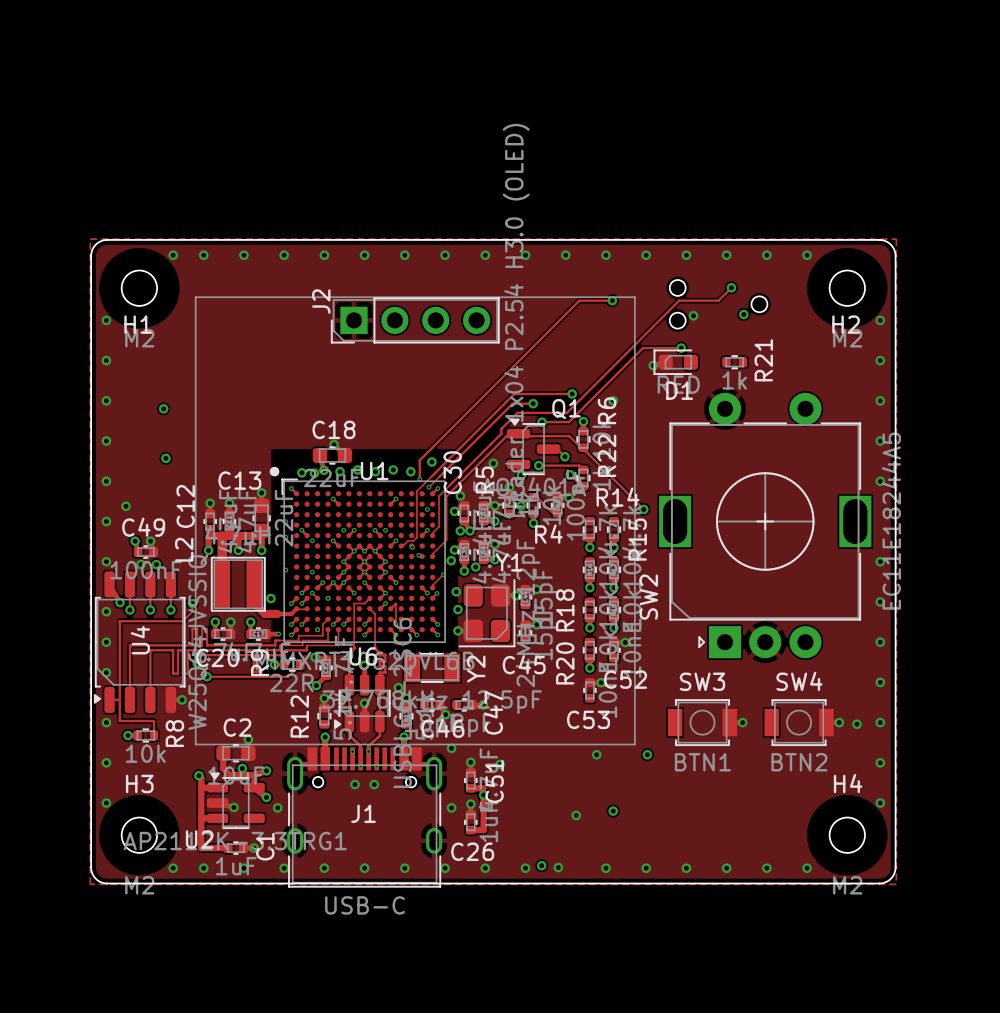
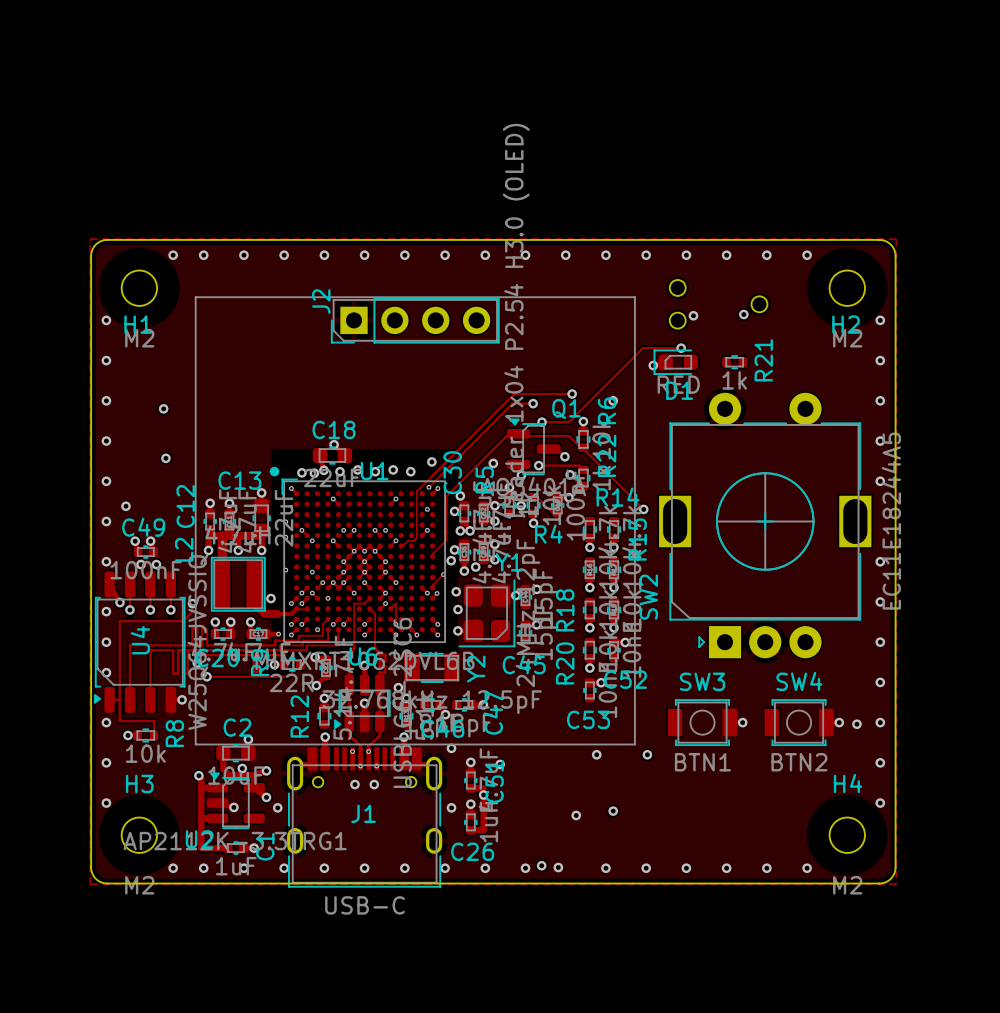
track: (731, 287) (718, 300) (679, 300) (566, 412) (517, 412) (501, 428) (501, 433) (439, 496) (439, 526) (432, 535) -> none
via: (731, 287) -> none
track: (612, 300) (579, 300) (419, 460) (419, 479) -> none
via: (612, 300) -> none
via: (419, 479) -> none
via: (412, 547) -> none
via: (418, 555) -> none

